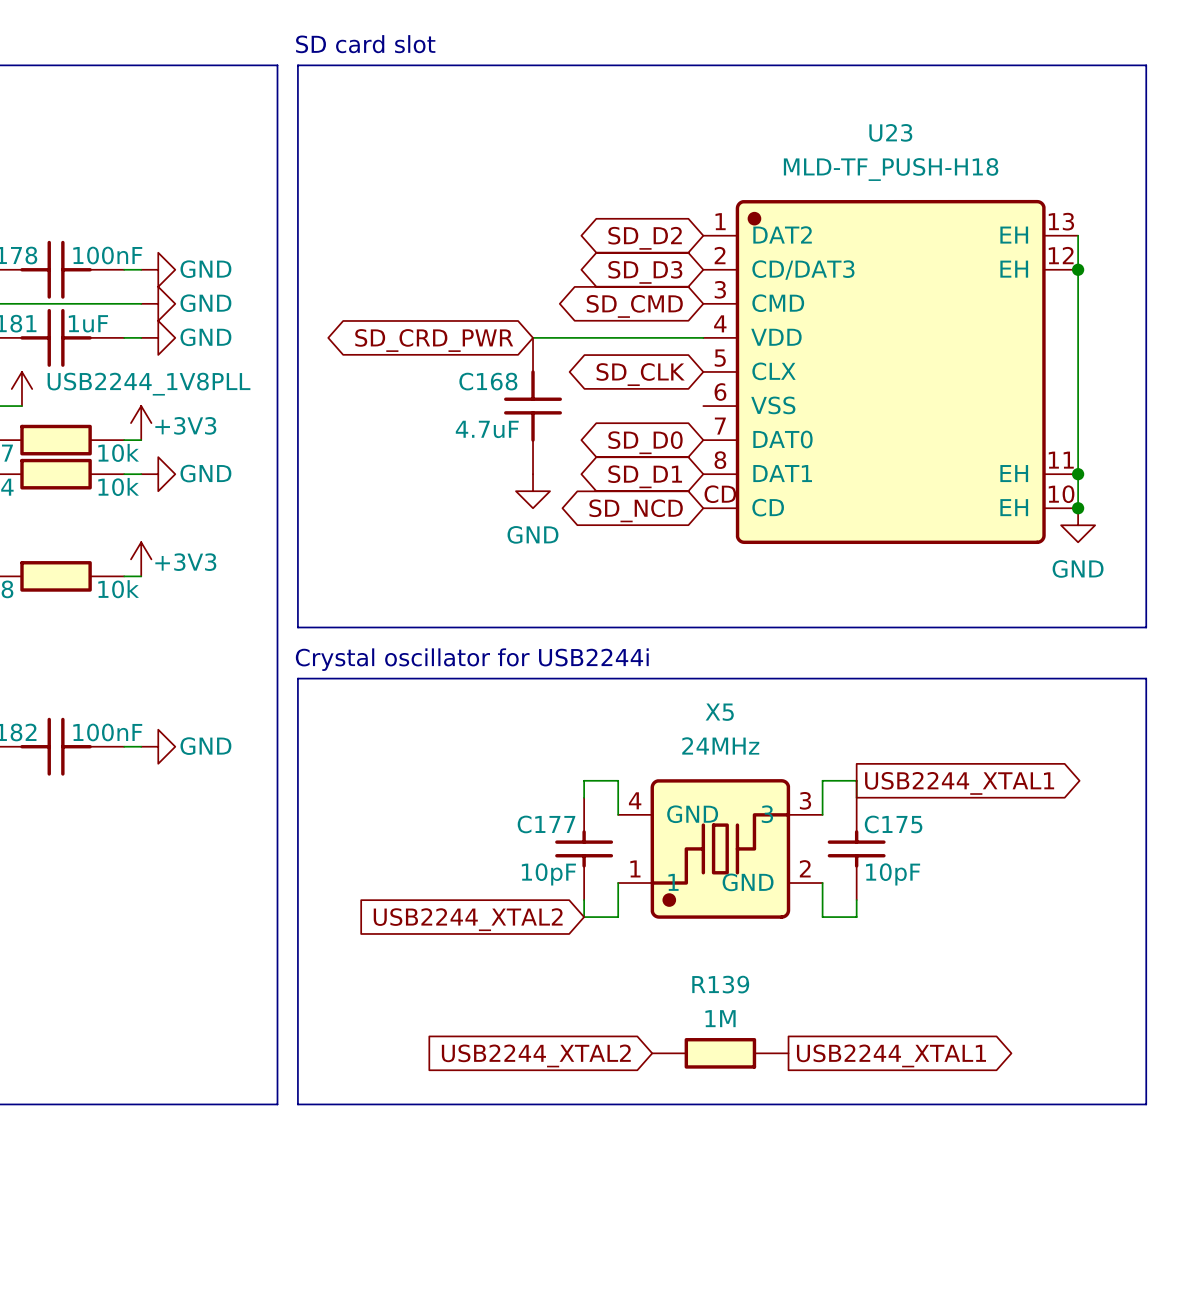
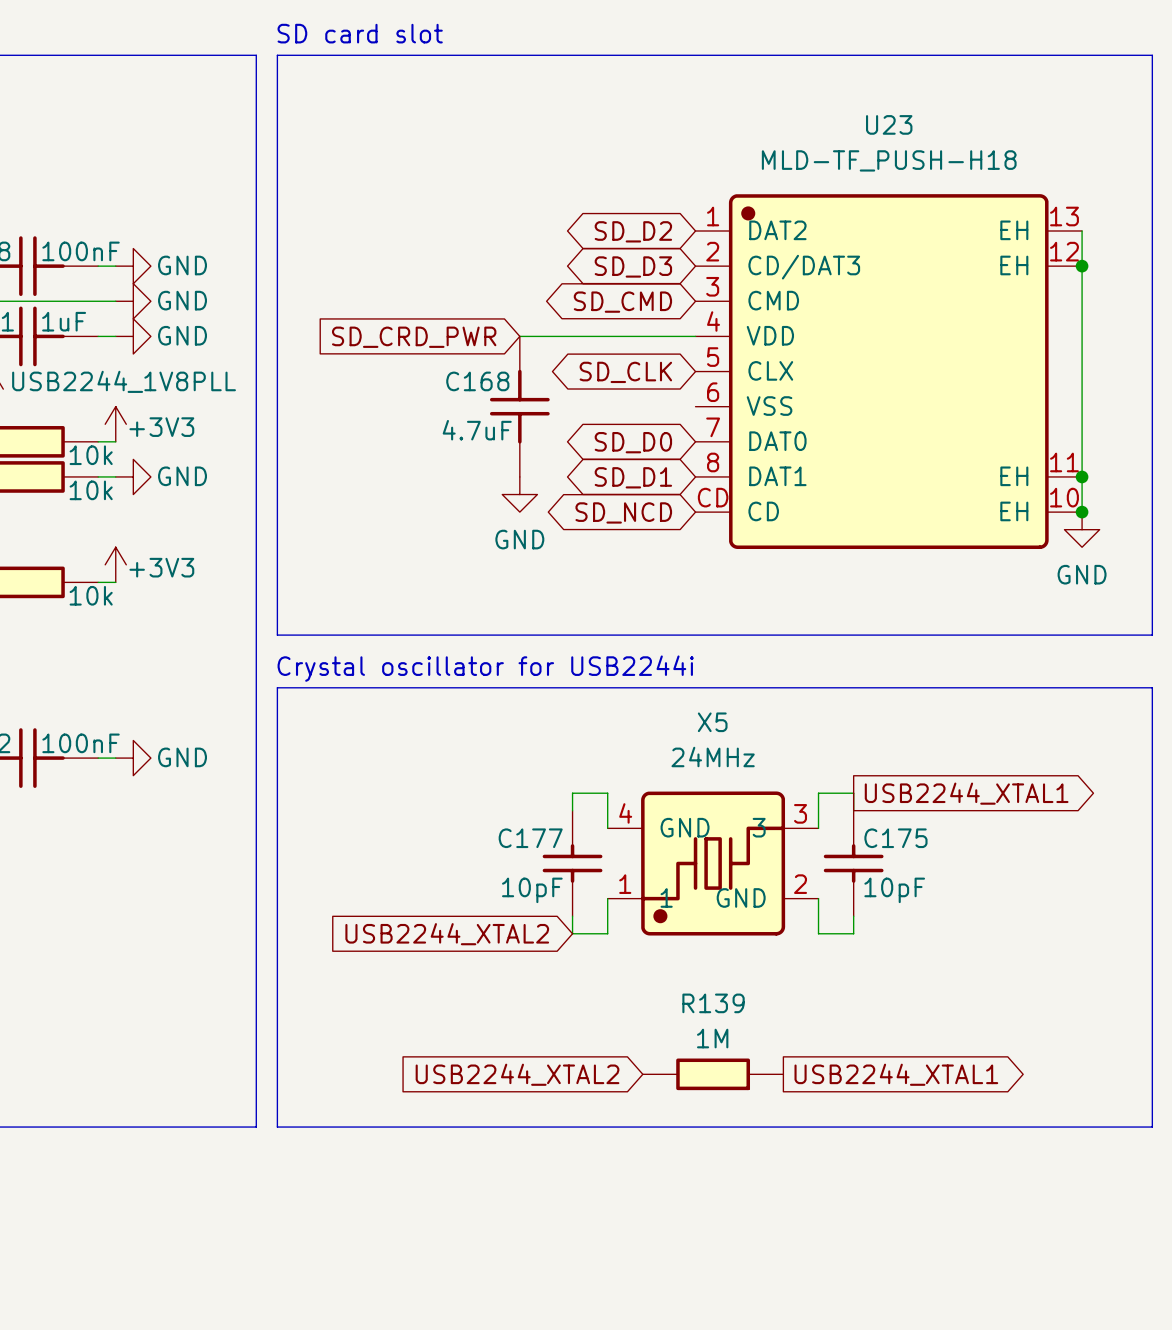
global label shape: bidirectional (434, 340) -> input (414, 337)

